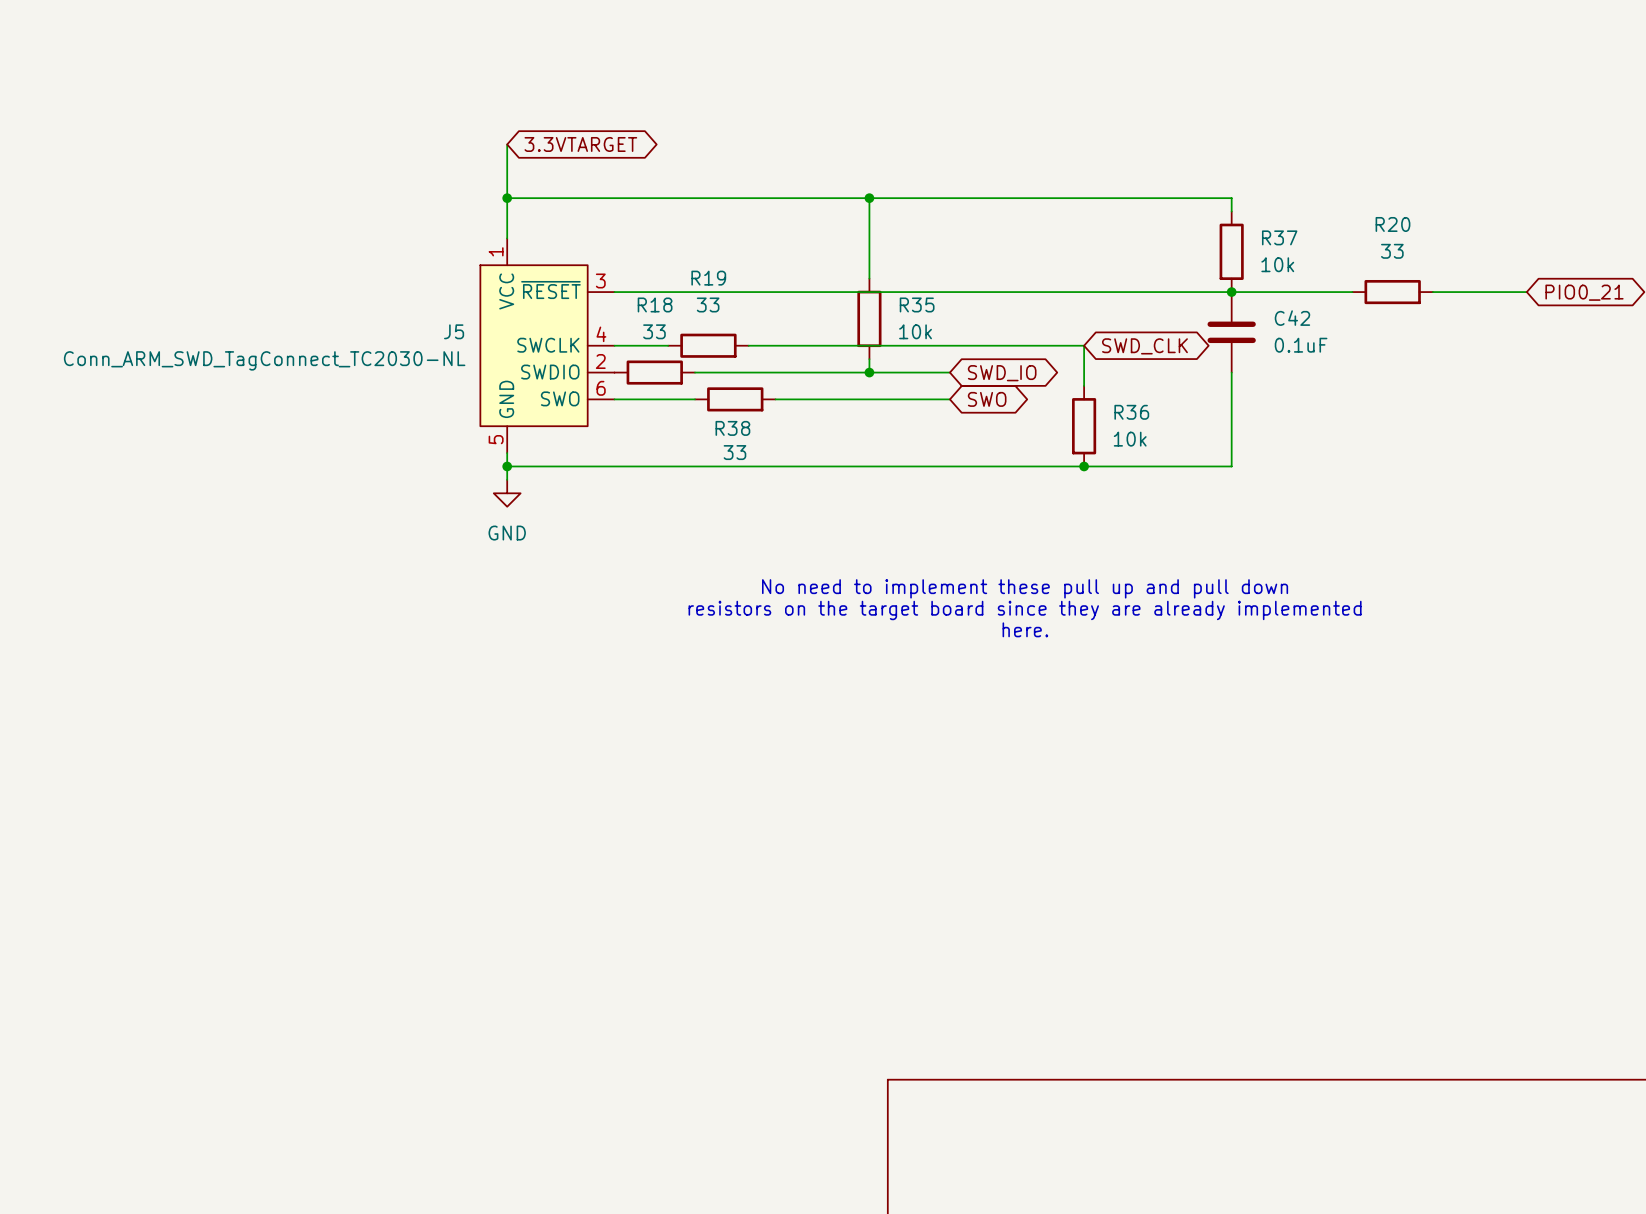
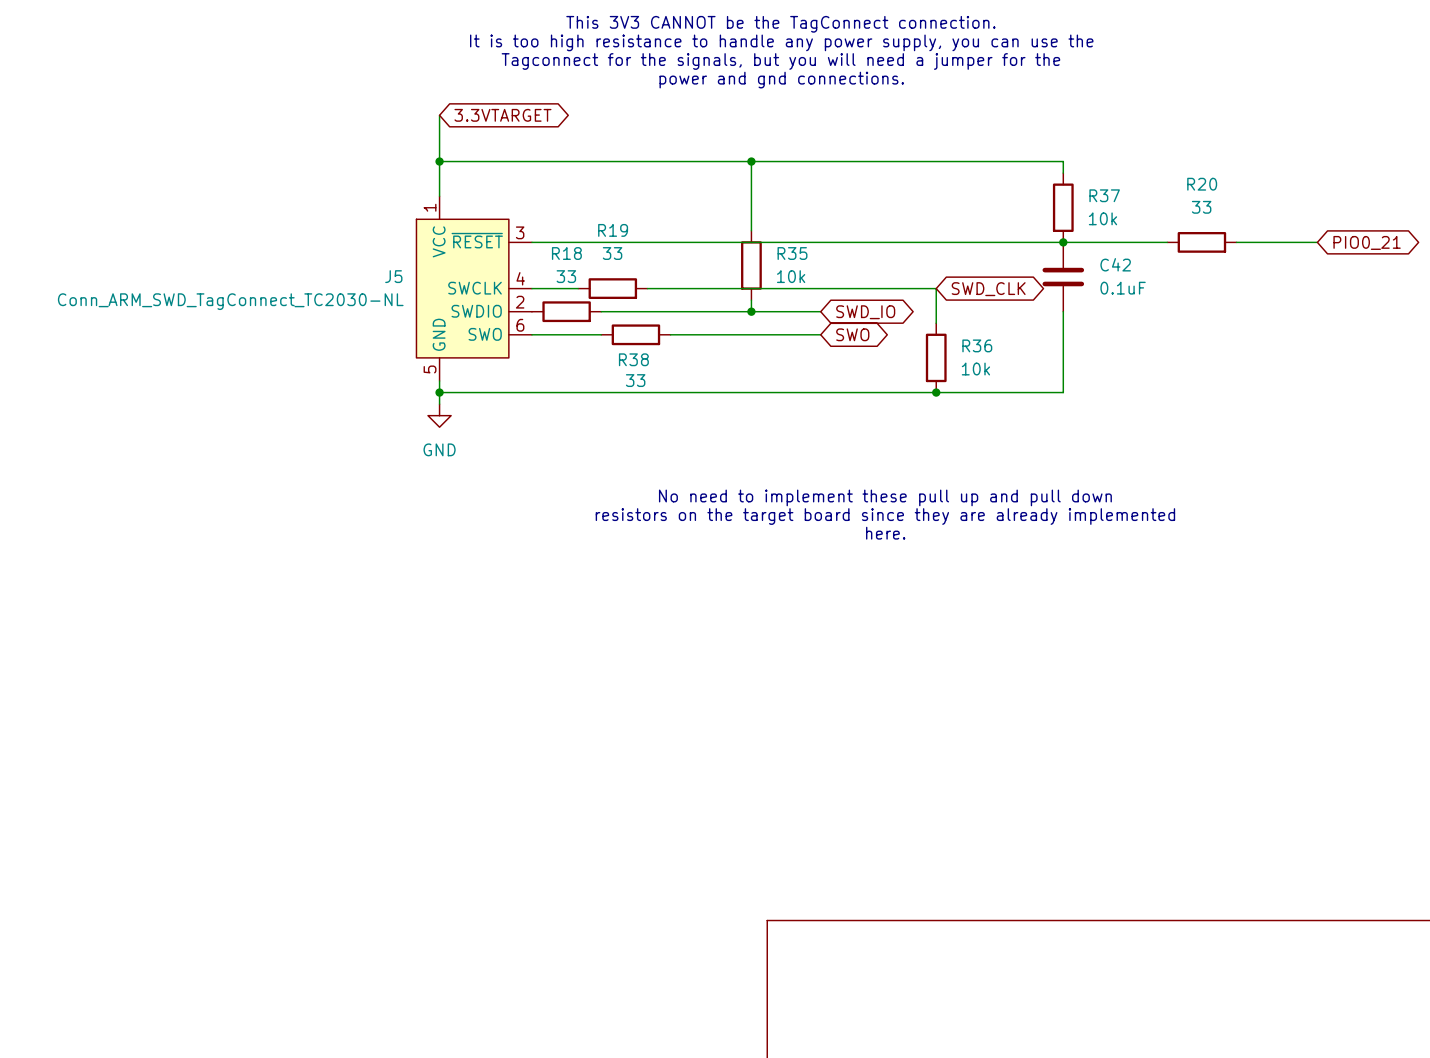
text: none -> This 3V3 CANNOT be the TagConnect connection. (780, 24)
text: none -> It is too high resistance to handle any power supply, you can use the (781, 42)
text: none -> Tagconnect for the signals, but you will need a jumper for the (780, 61)
text: none -> power and gnd connections. (781, 80)

